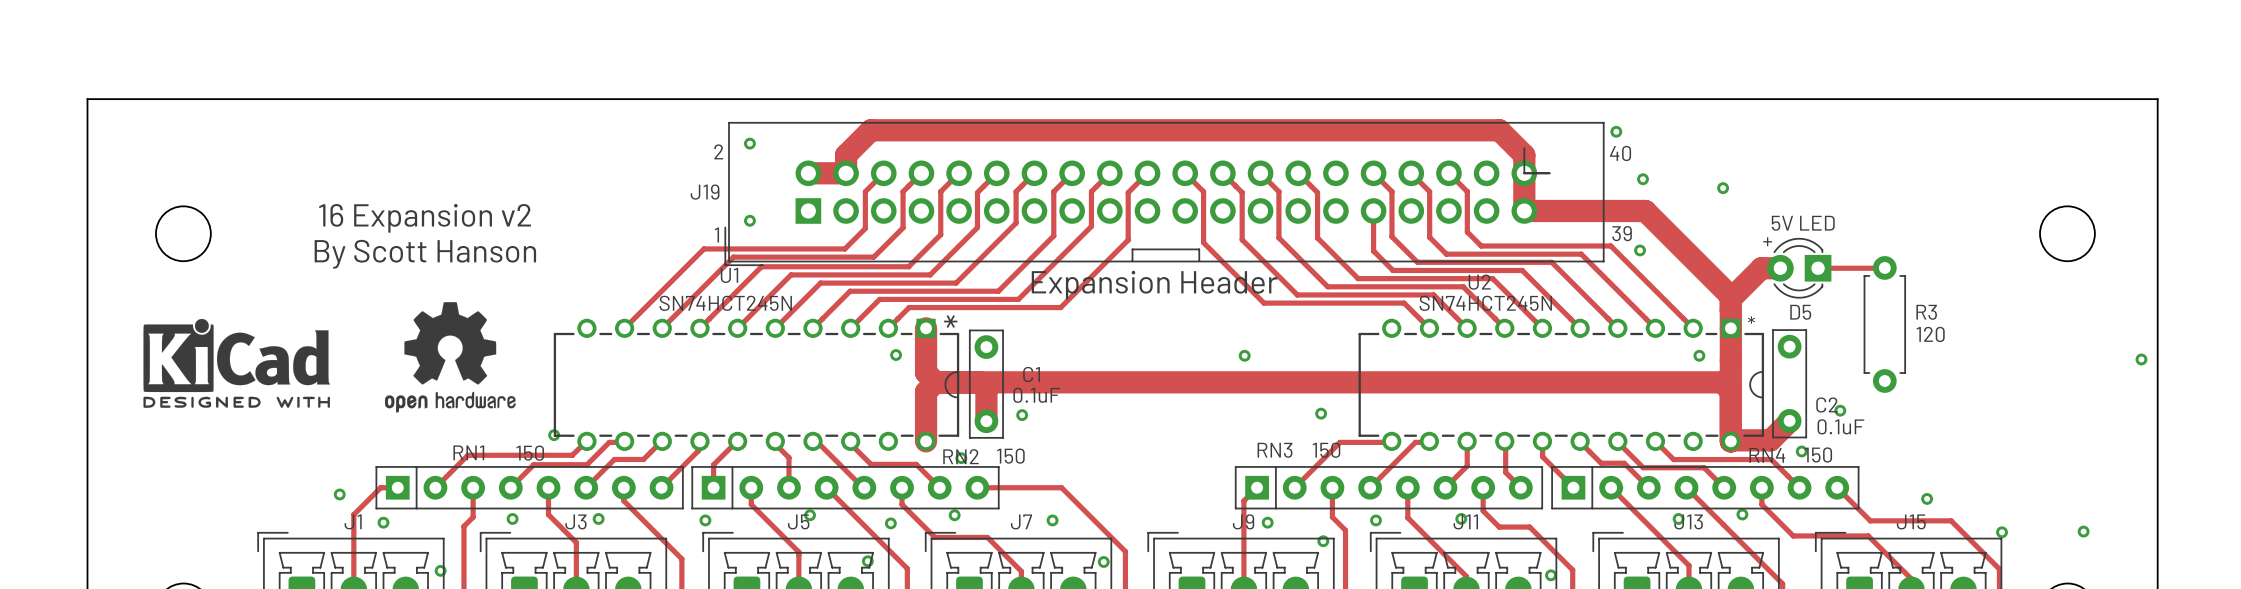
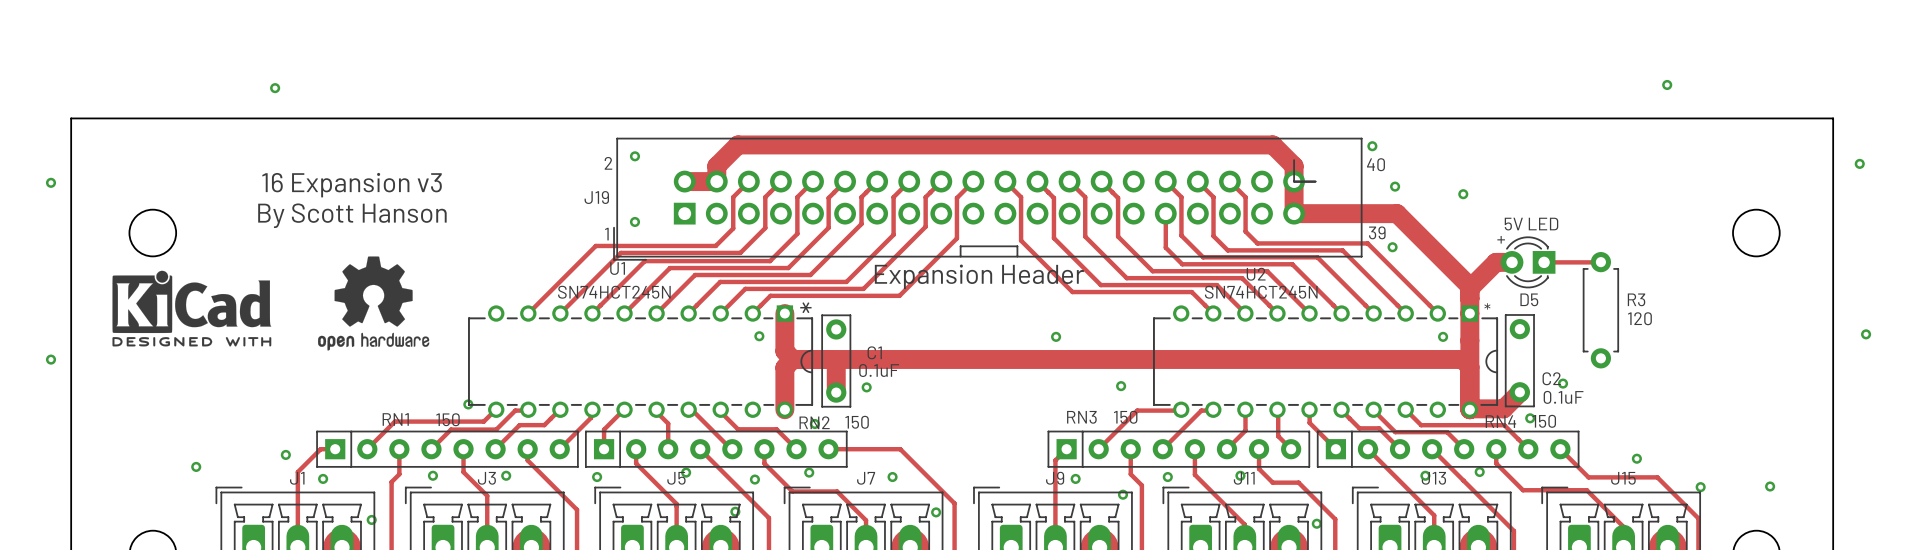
via: none -> (1667, 84)
via: none -> (275, 88)
via: none -> (1859, 163)
via: none -> (51, 182)
text: 16 Expansion v2 (425, 218) -> 16 Expansion v3 (352, 185)
text position: By Scott Hanson (425, 254) -> By Scott Hanson (352, 215)
drawing position: (450, 357) -> (373, 303)
via position: (2141, 359) -> (1866, 334)
drawing position: (236, 363) -> (191, 308)
via: none -> (51, 359)
via: none -> (196, 466)

